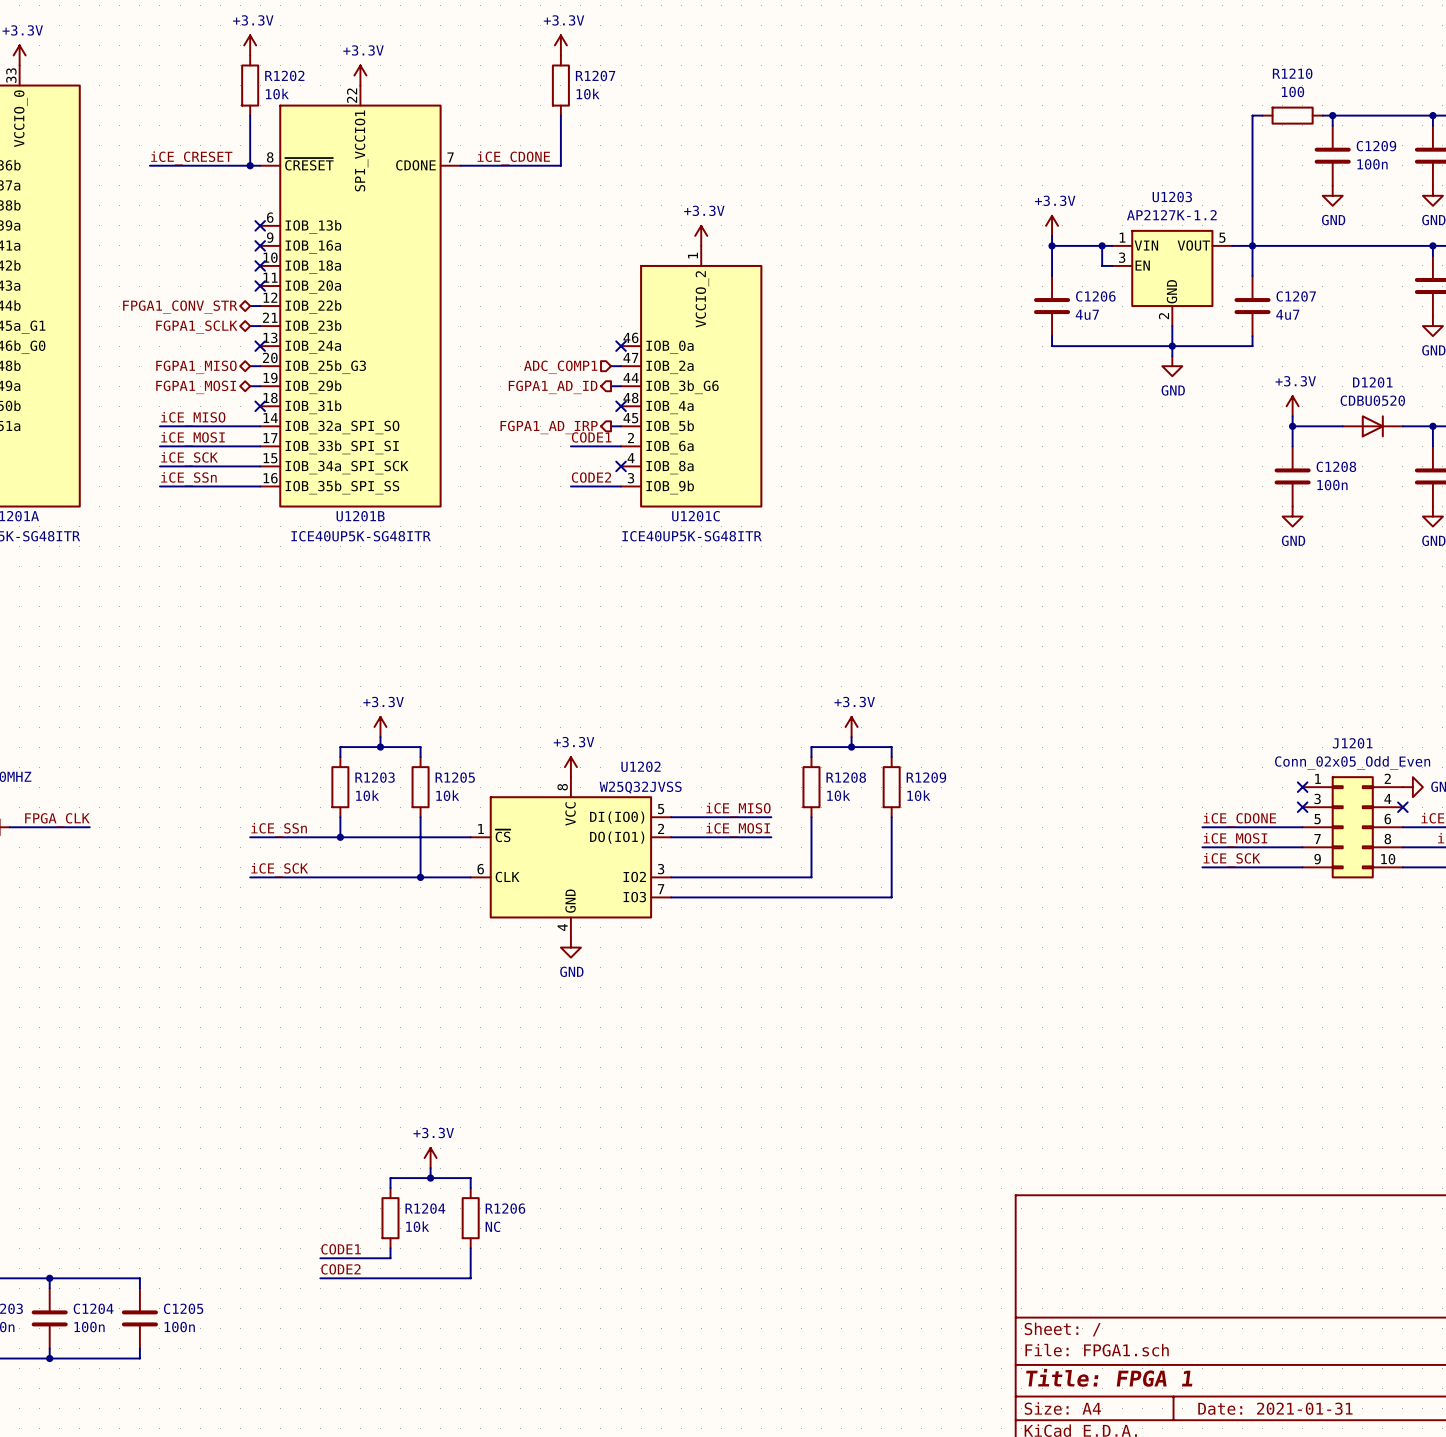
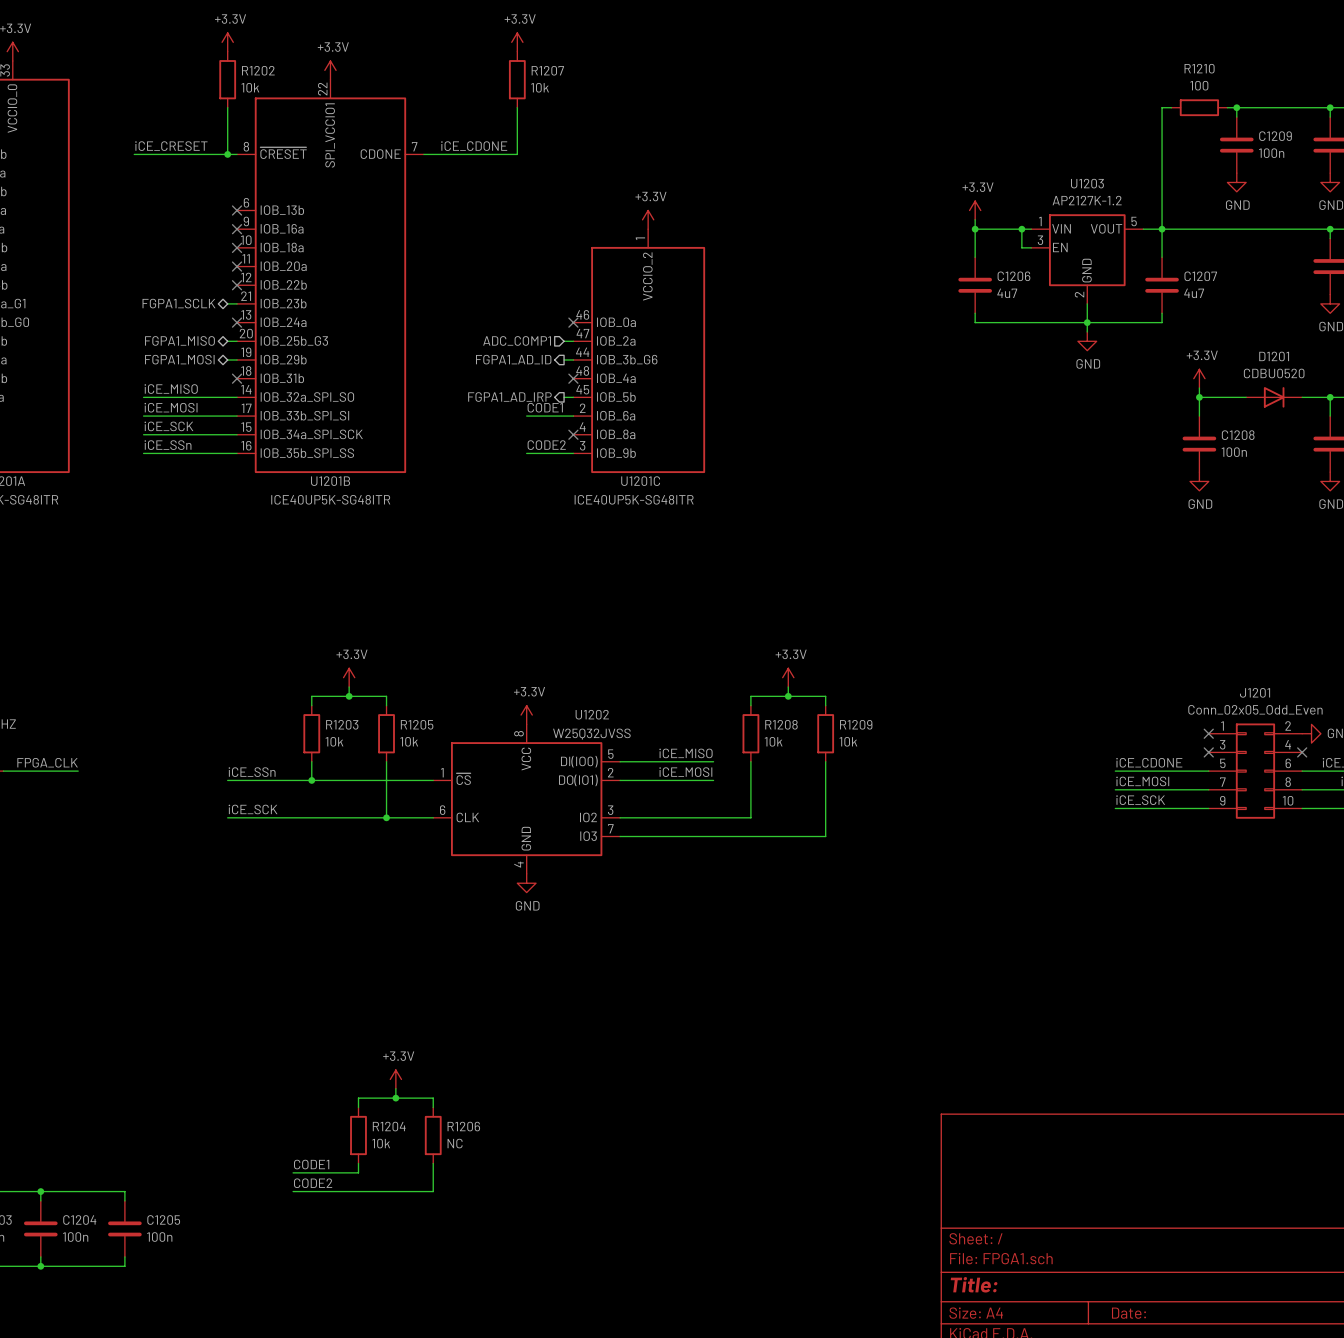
wire: (250, 306) (260, 306) -> none
no-connect mark: none -> (237, 285)
hierarchical label: FPGA1_CONV_STR (180, 307) -> none
title block: Title: FPGA 1 (1109, 1377) -> Title: (974, 1284)
title block: Date: 2021-01-31 (1275, 1408) -> Date: (1128, 1313)

